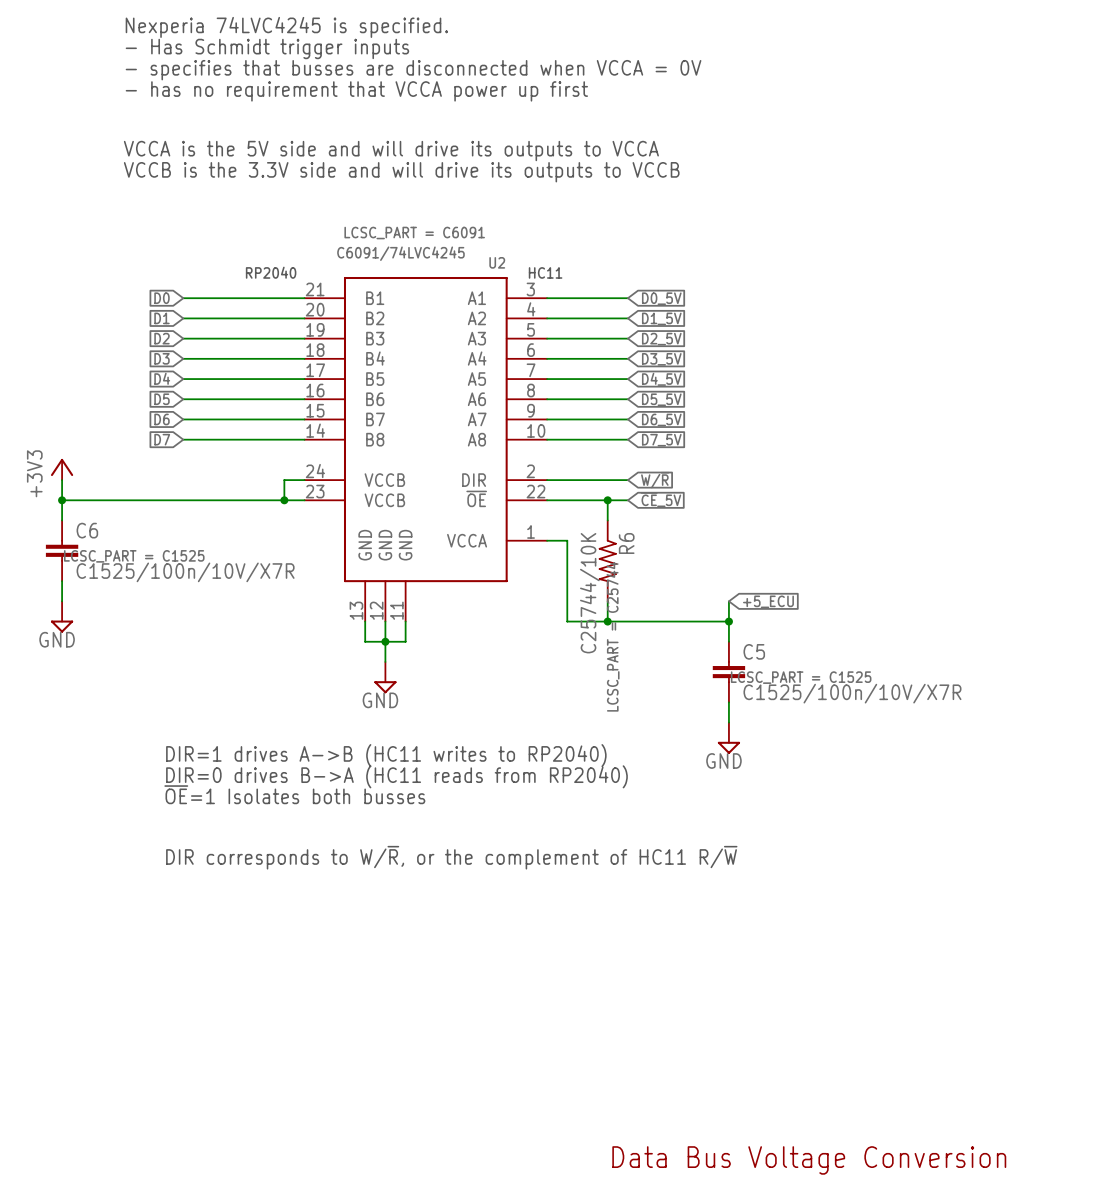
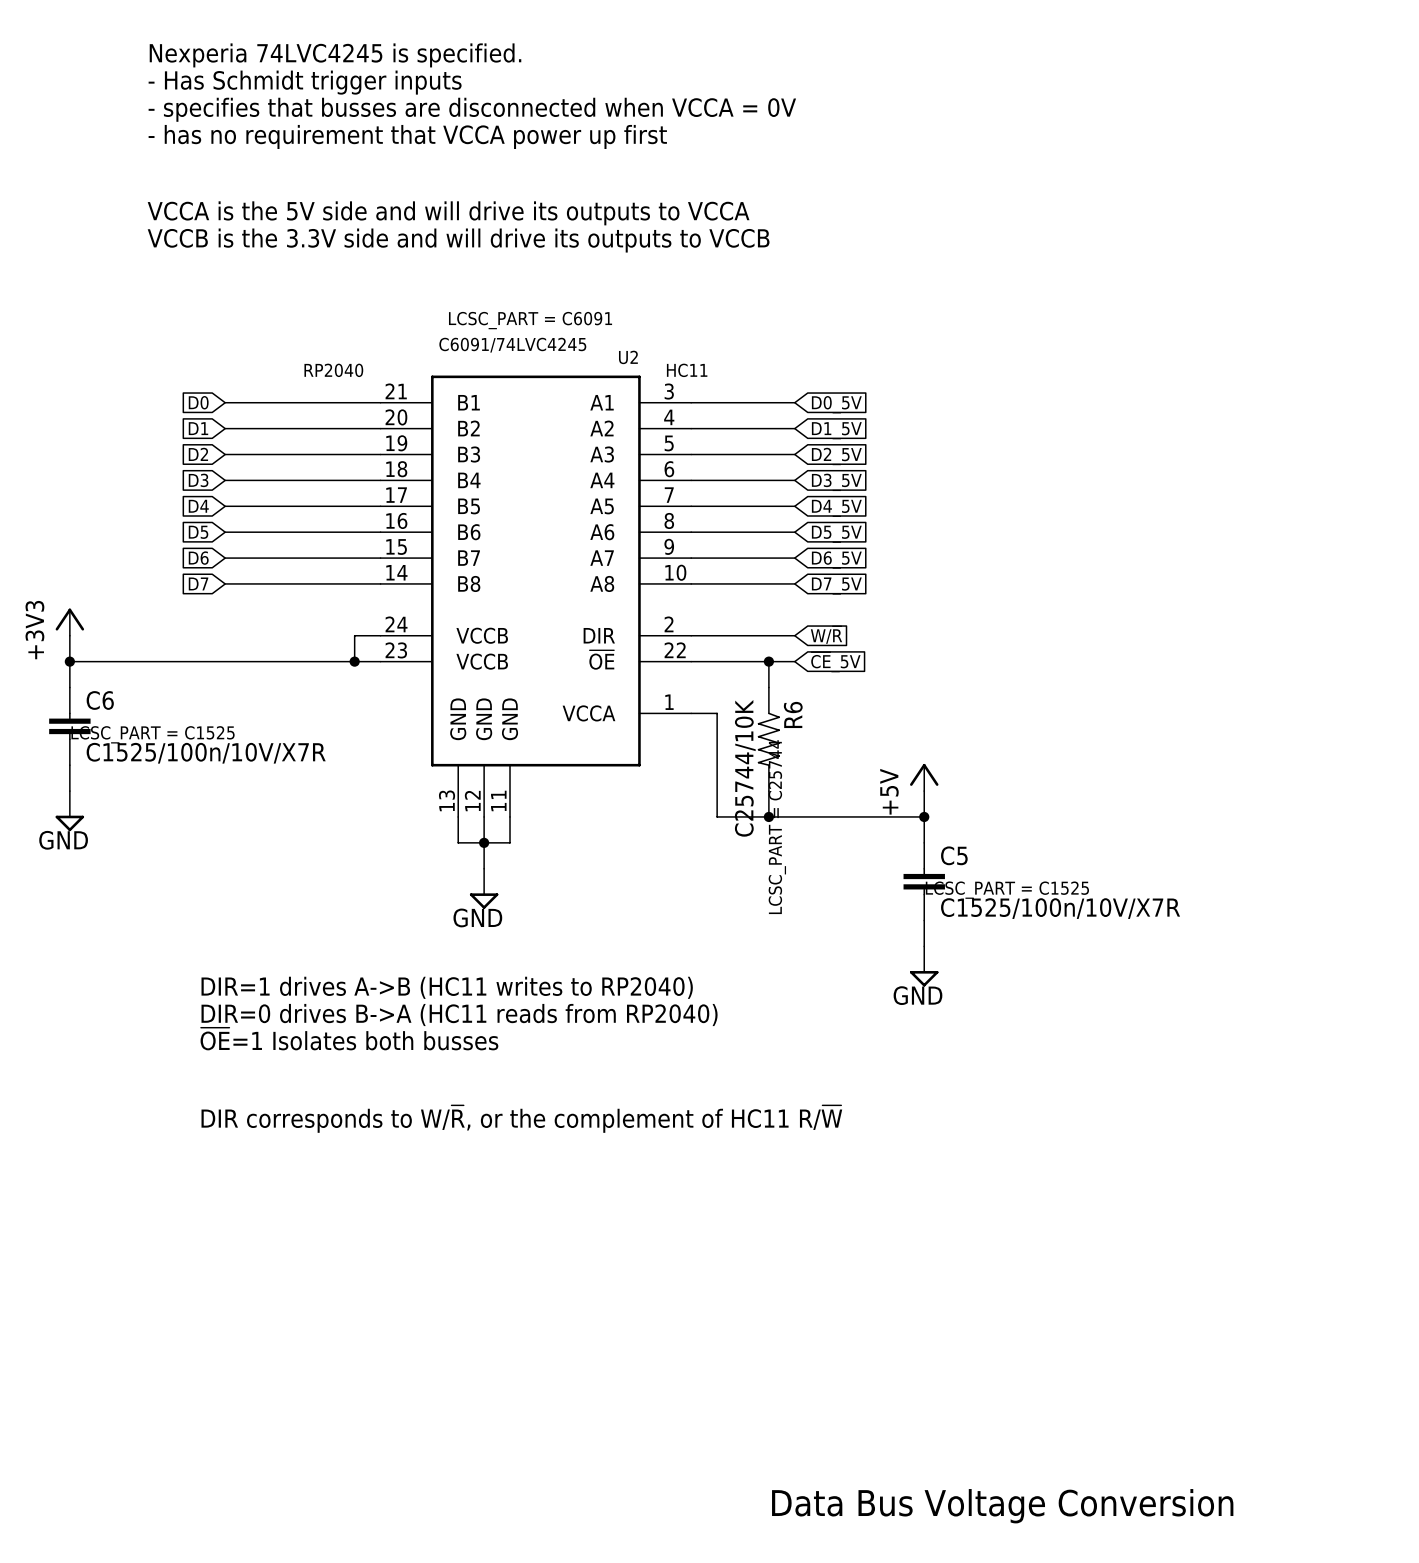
power symbol: none -> +5V (924, 777)
global label: +5_ECU (768, 601) -> none

